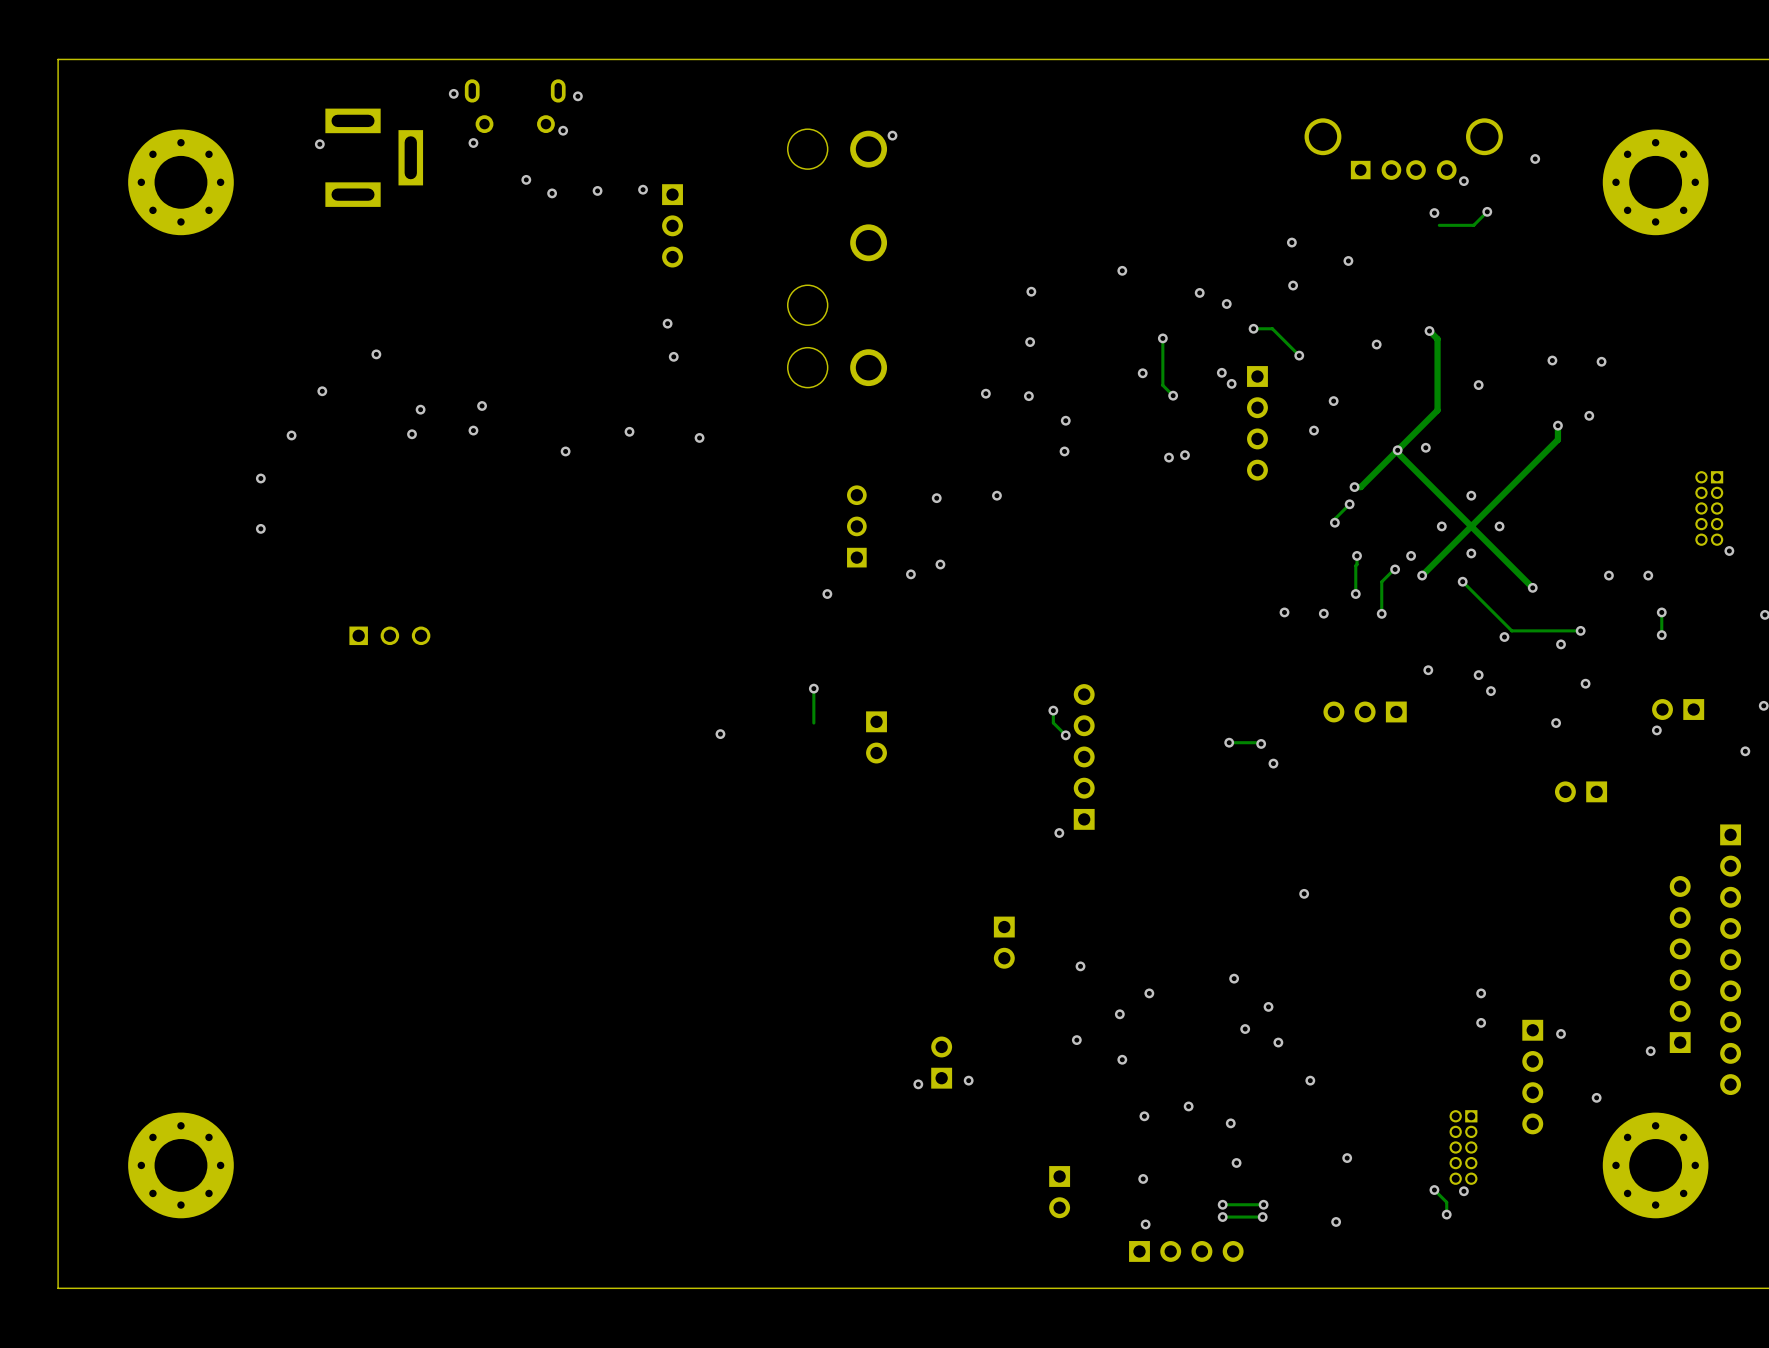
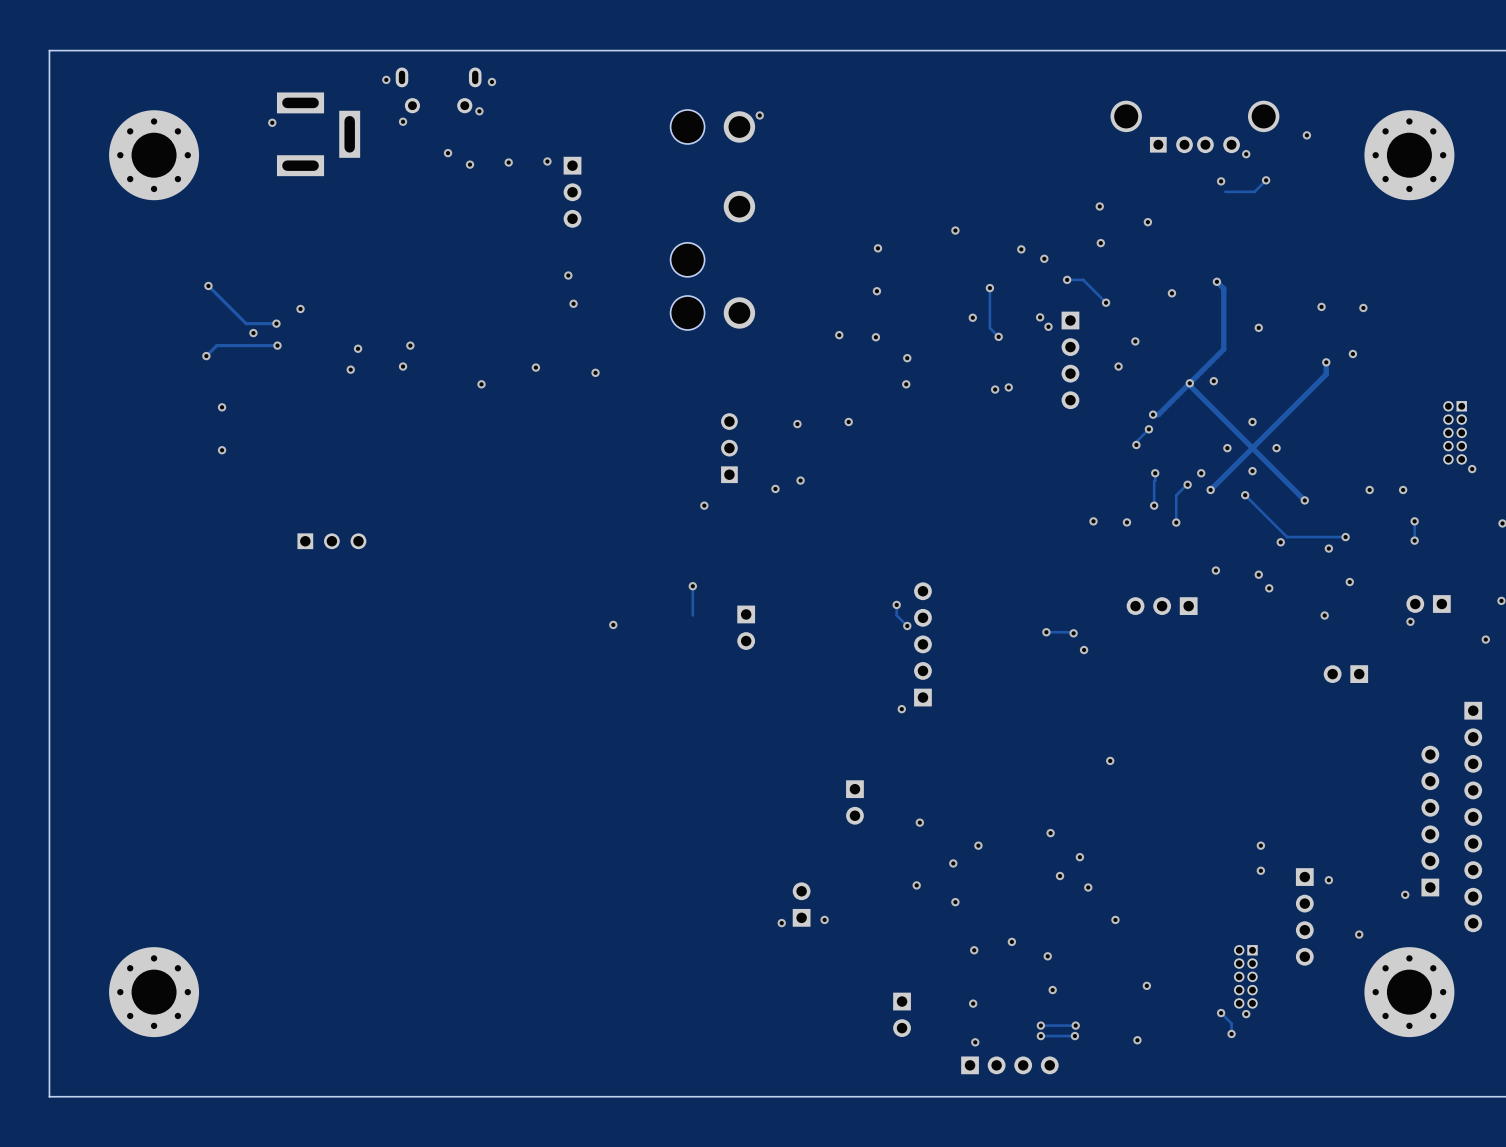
track: none -> (208, 285) (246, 323) (276, 323)
via: none -> (208, 285)
via: (376, 354) -> none
via: none -> (300, 309)
via: none -> (276, 323)
via: none -> (253, 333)
via: (322, 391) -> none
track: none -> (277, 345) (216, 345) (206, 356)
via: none -> (277, 345)
via: none -> (206, 356)
via: (291, 435) -> none

